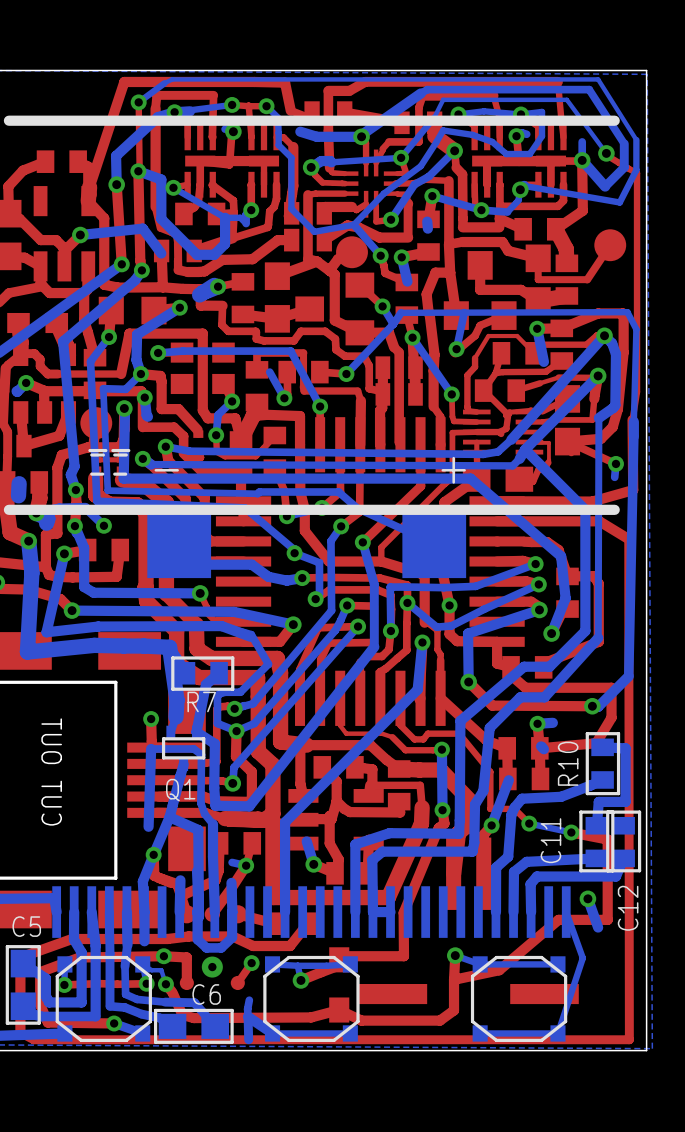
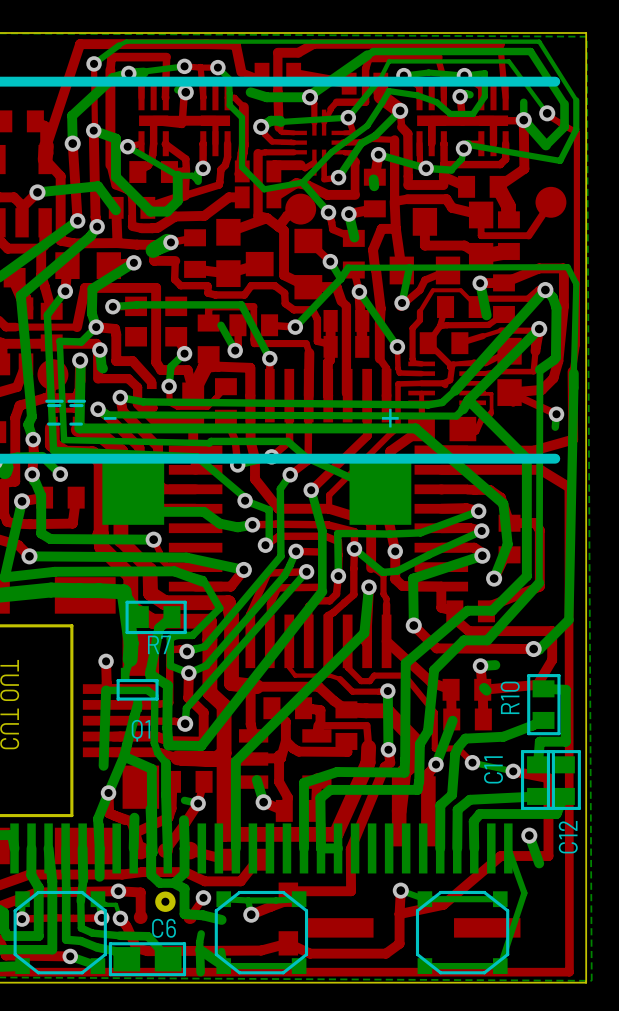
bottom track: none -> (174, 883) (184, 888) (184, 914) (203, 915) (221, 919)
bottom track: none -> (221, 951) (223, 966)

